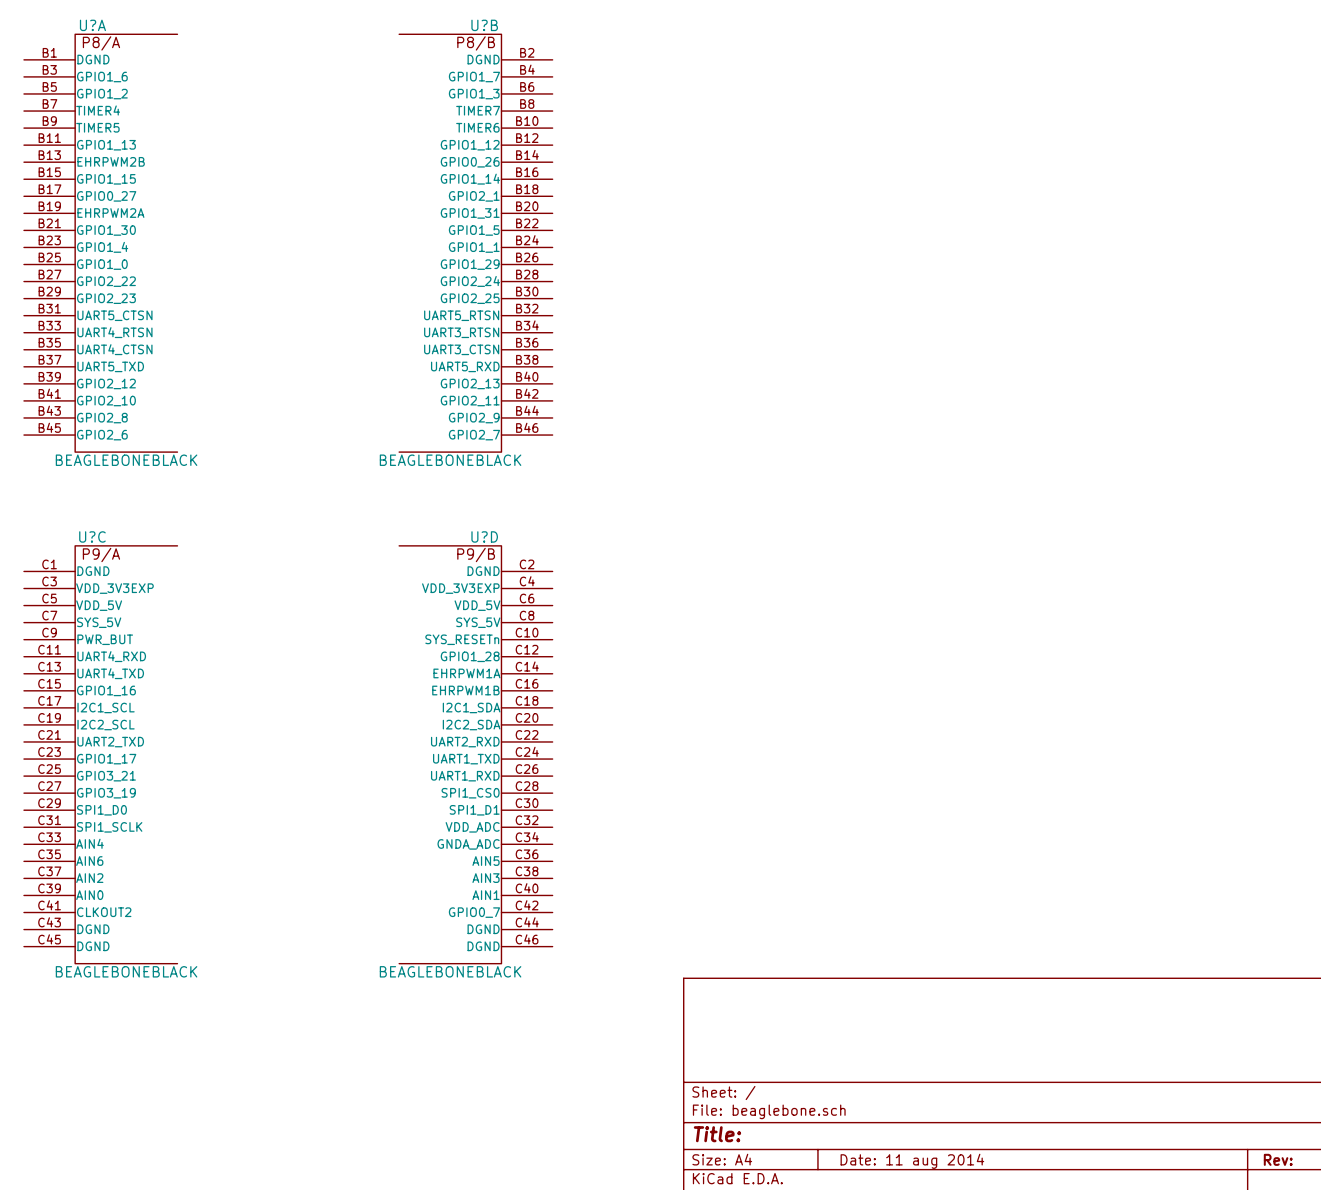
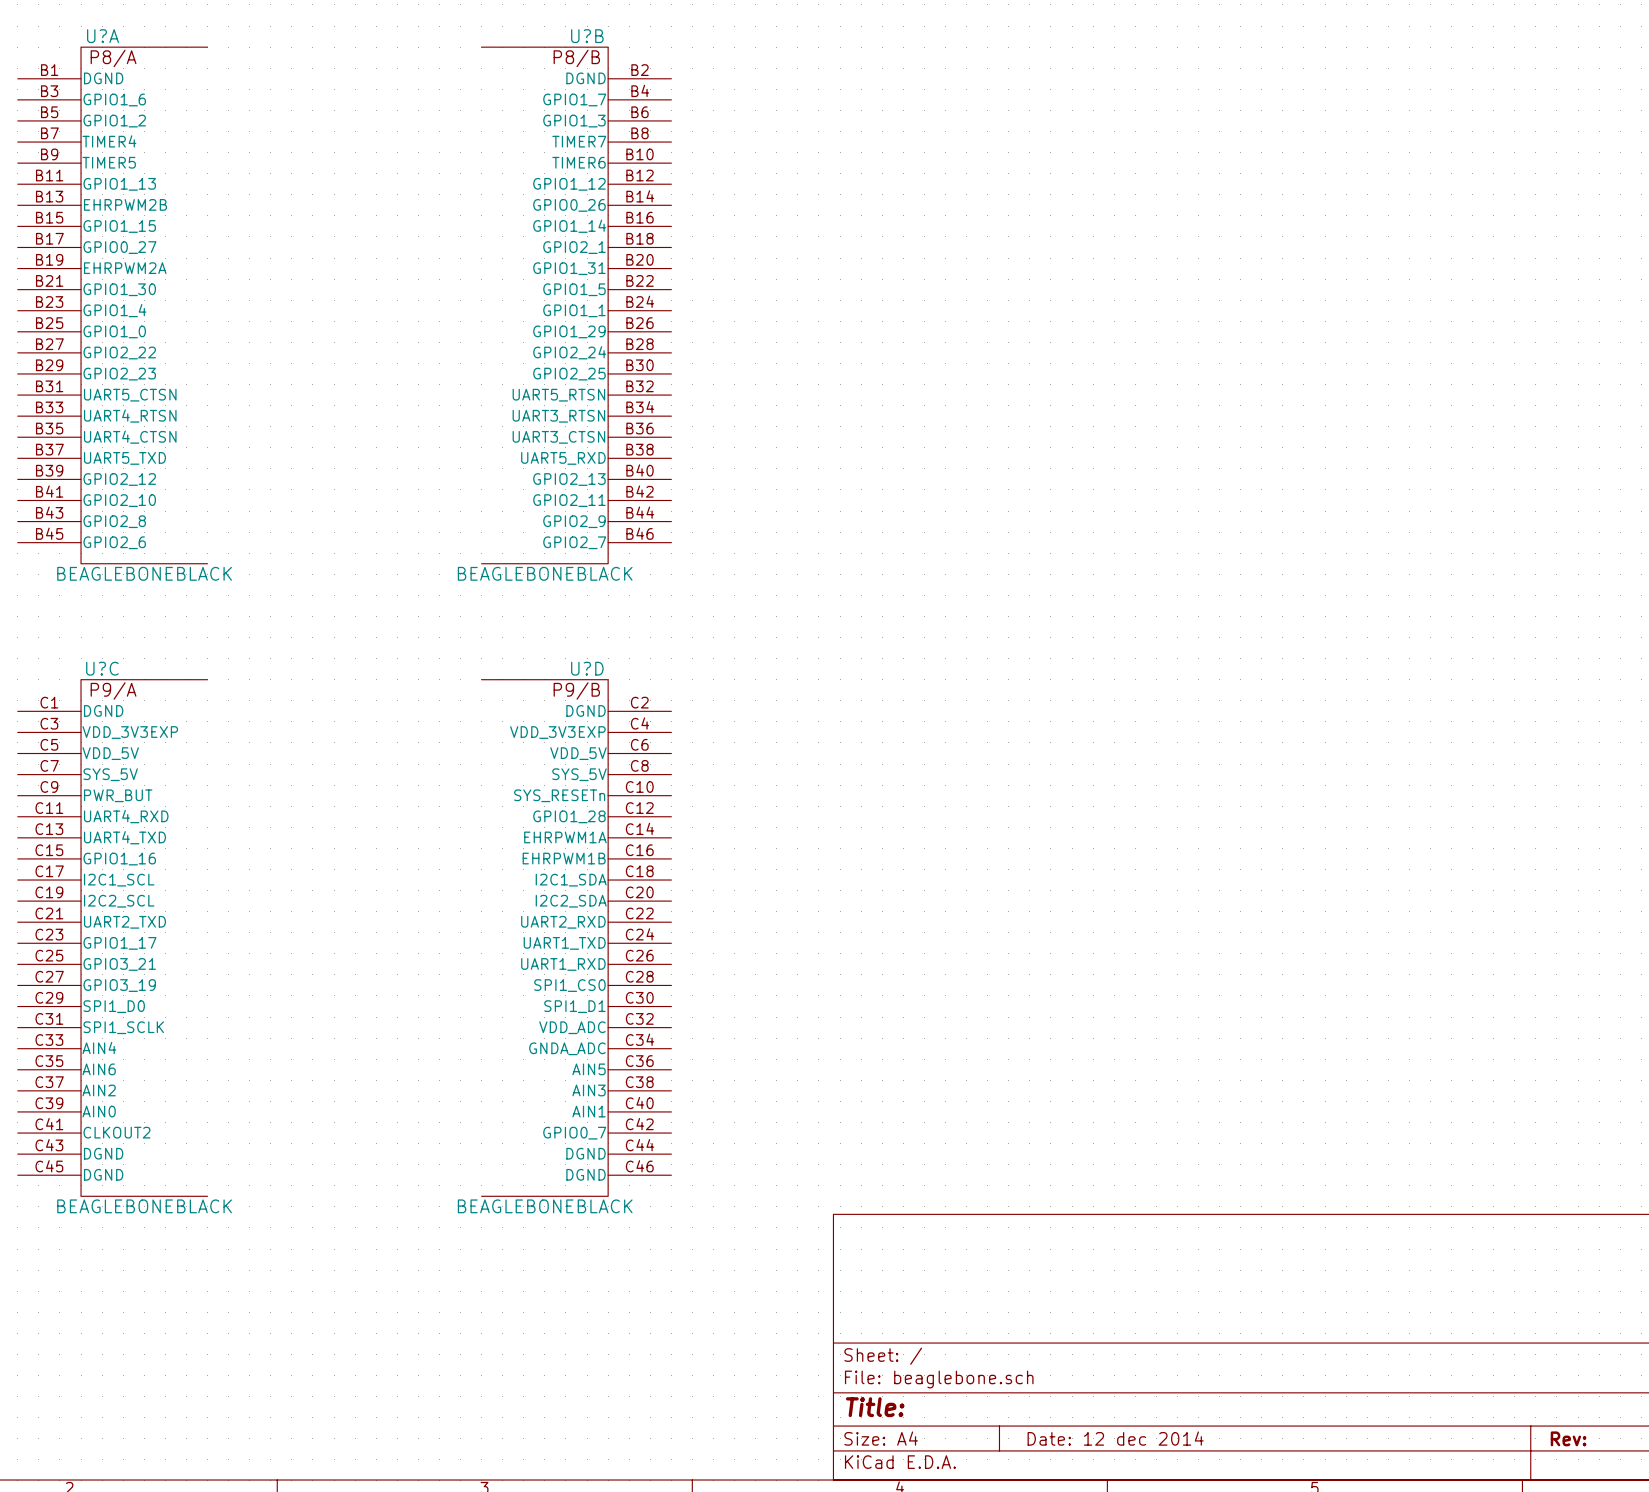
title block: Date: 11 aug 2014 (912, 1161) -> Date: 12 dec 2014 (1115, 1438)

